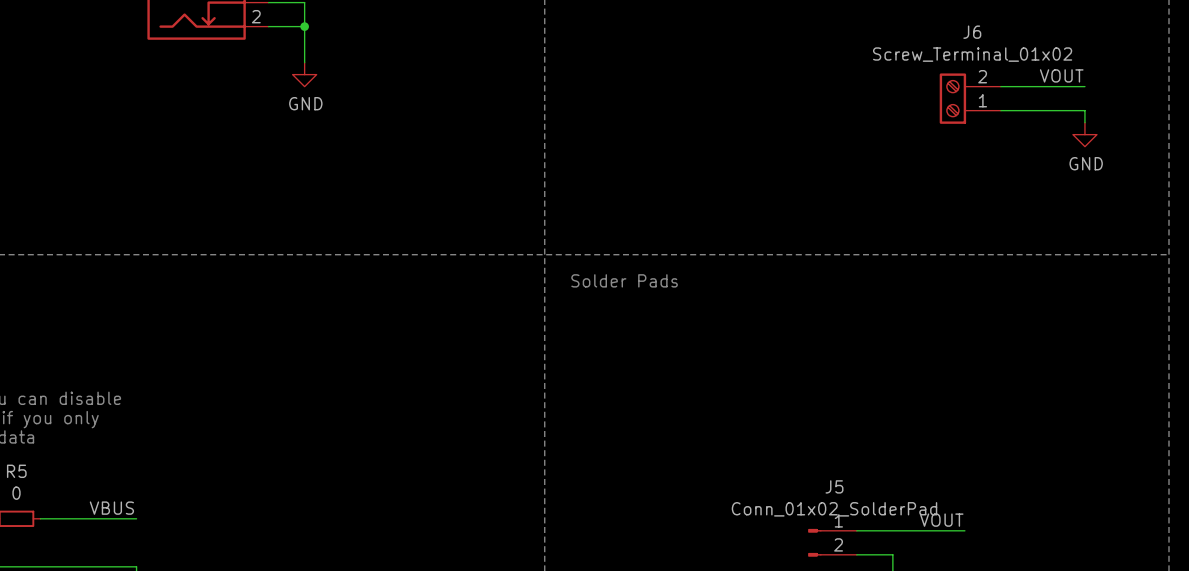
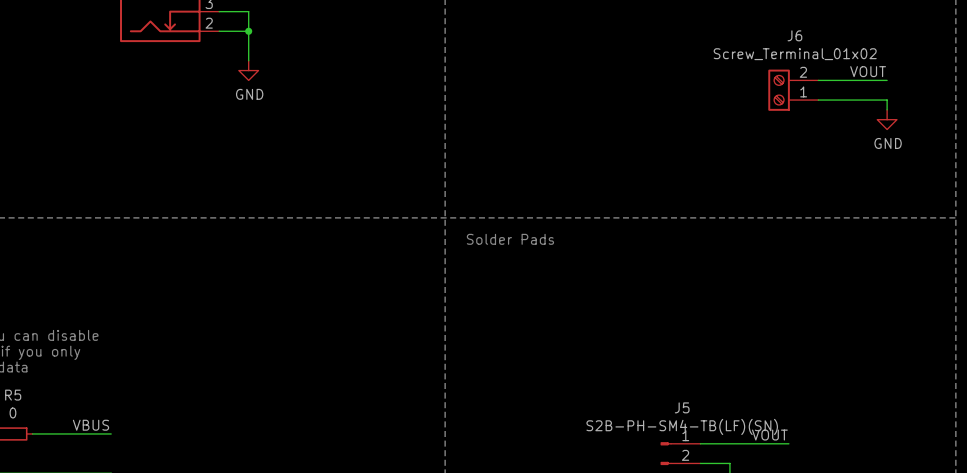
J5 value: Conn_01x02_SolderPad (834, 509) -> S2B-PH-SM4-TB(LF)(SN) (682, 426)

